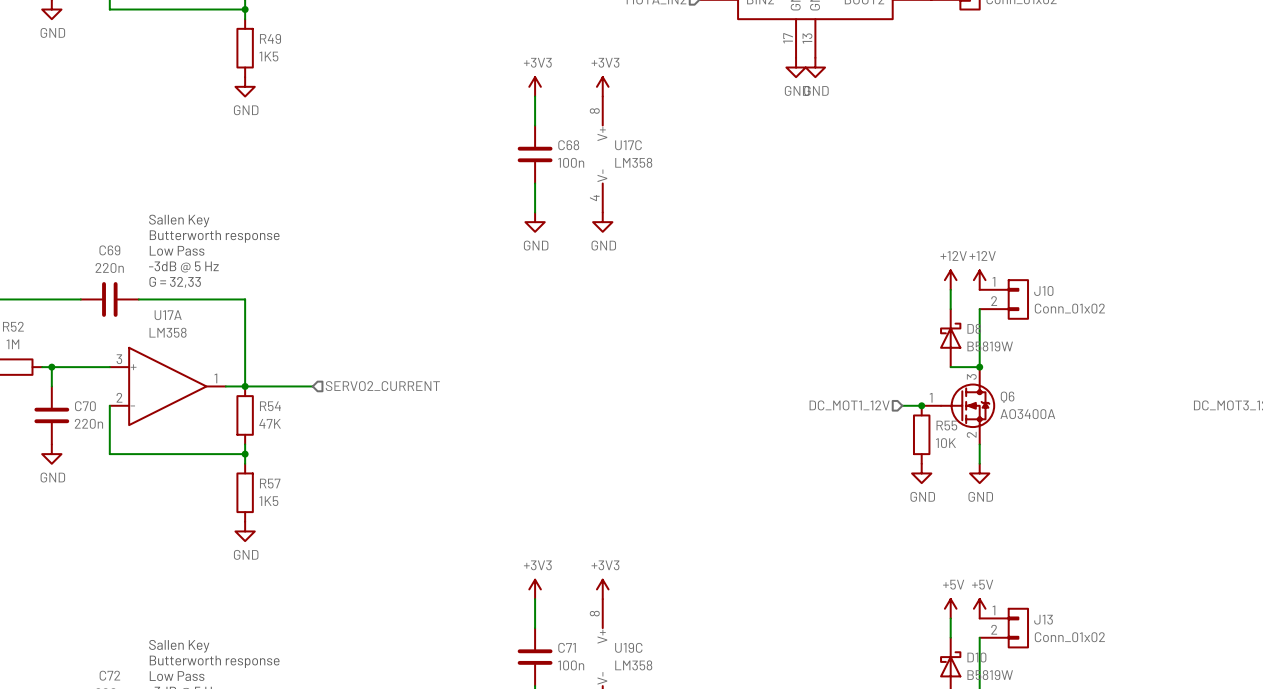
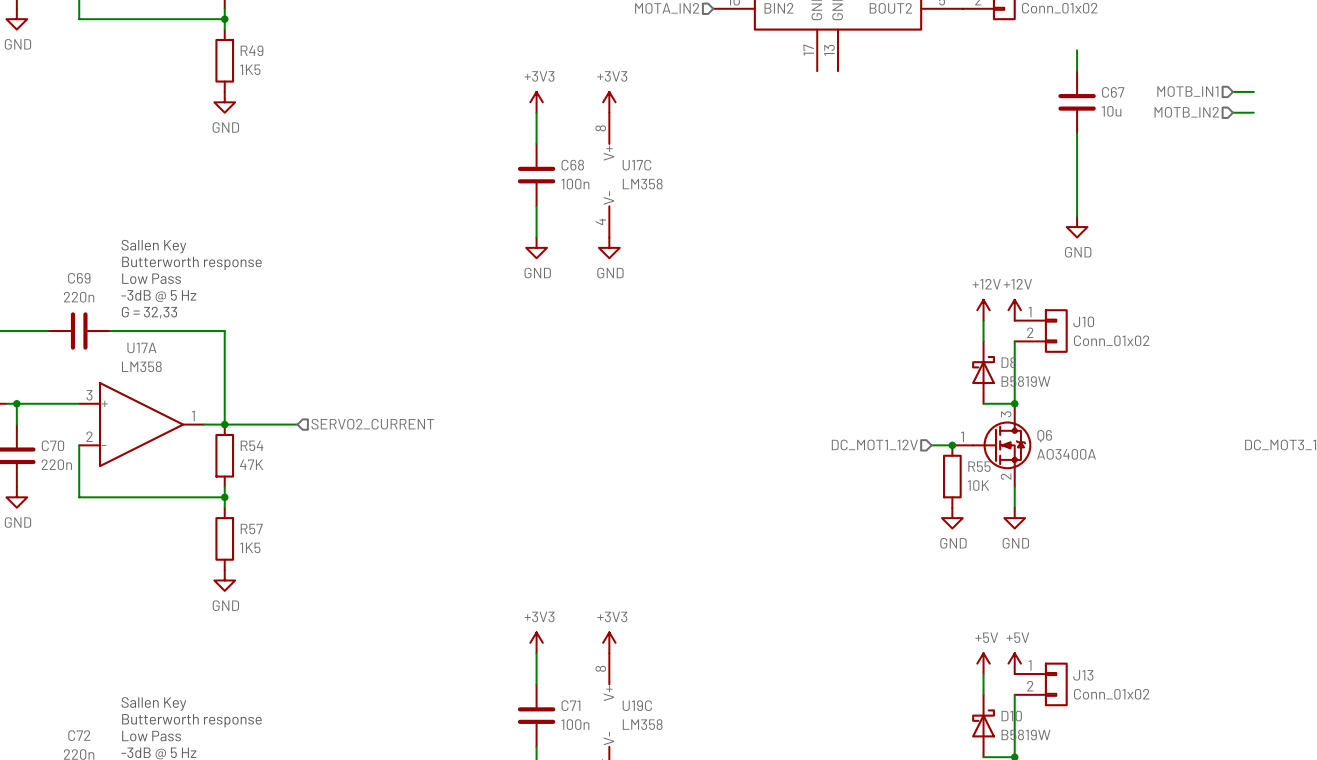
wire: none -> (1077, 50) (1077, 71)
power symbol: GND (796, 67) -> none
power symbol: GND (815, 67) -> none
hierarchical label: none -> MOTB_IN1 (1187, 91)
wire: none -> (1233, 91) (1253, 91)
C67: none -> 10u (1077, 102)
hierarchical label: none -> MOTB_IN2 (1186, 112)
wire: none -> (1233, 112) (1253, 112)
wire: none -> (1077, 133) (1077, 216)
power symbol: none -> GND (1077, 227)

